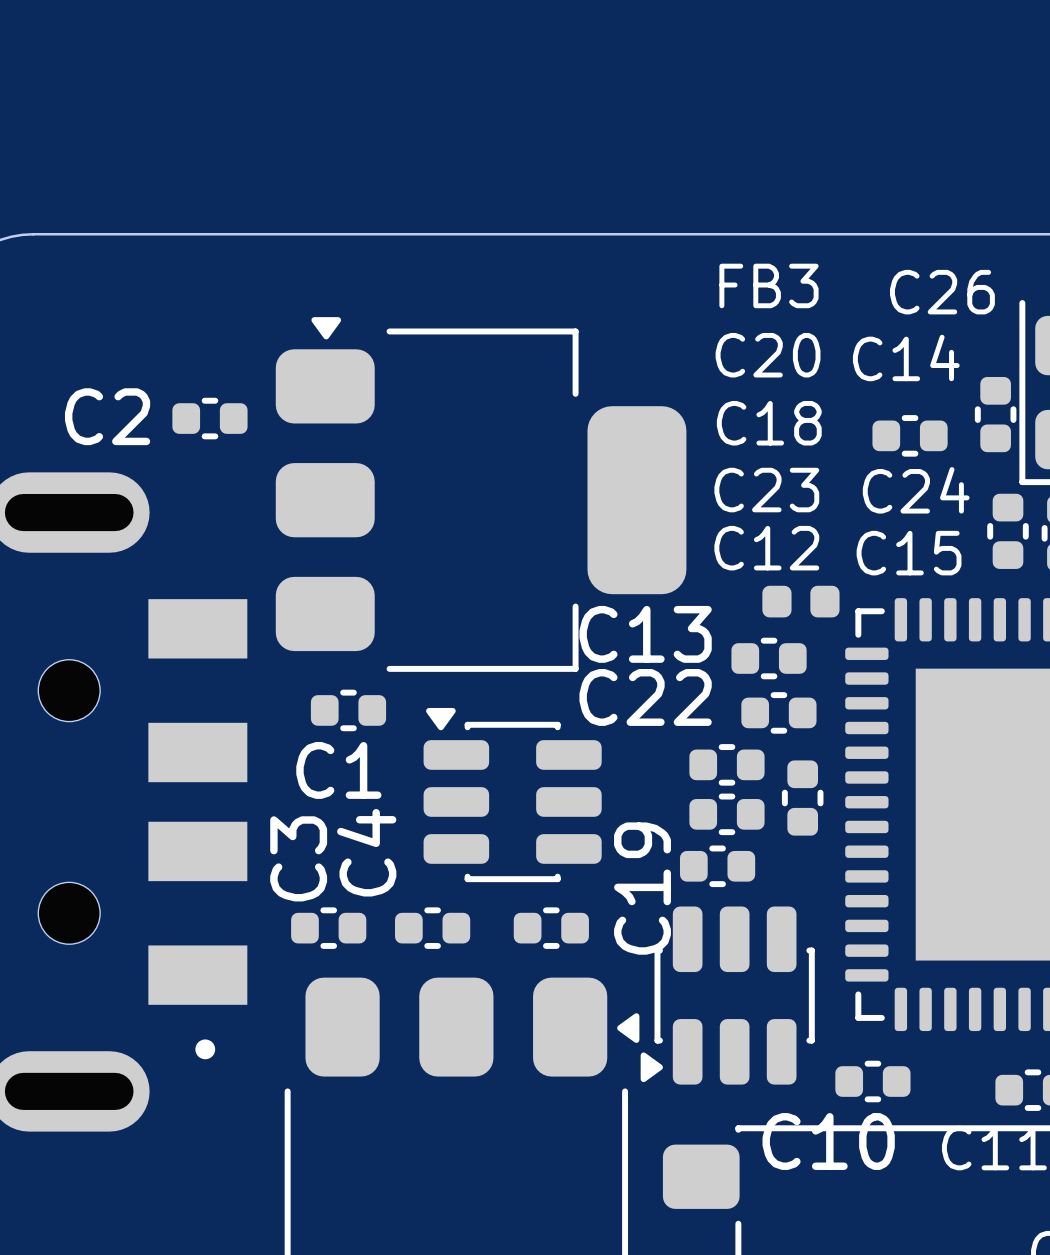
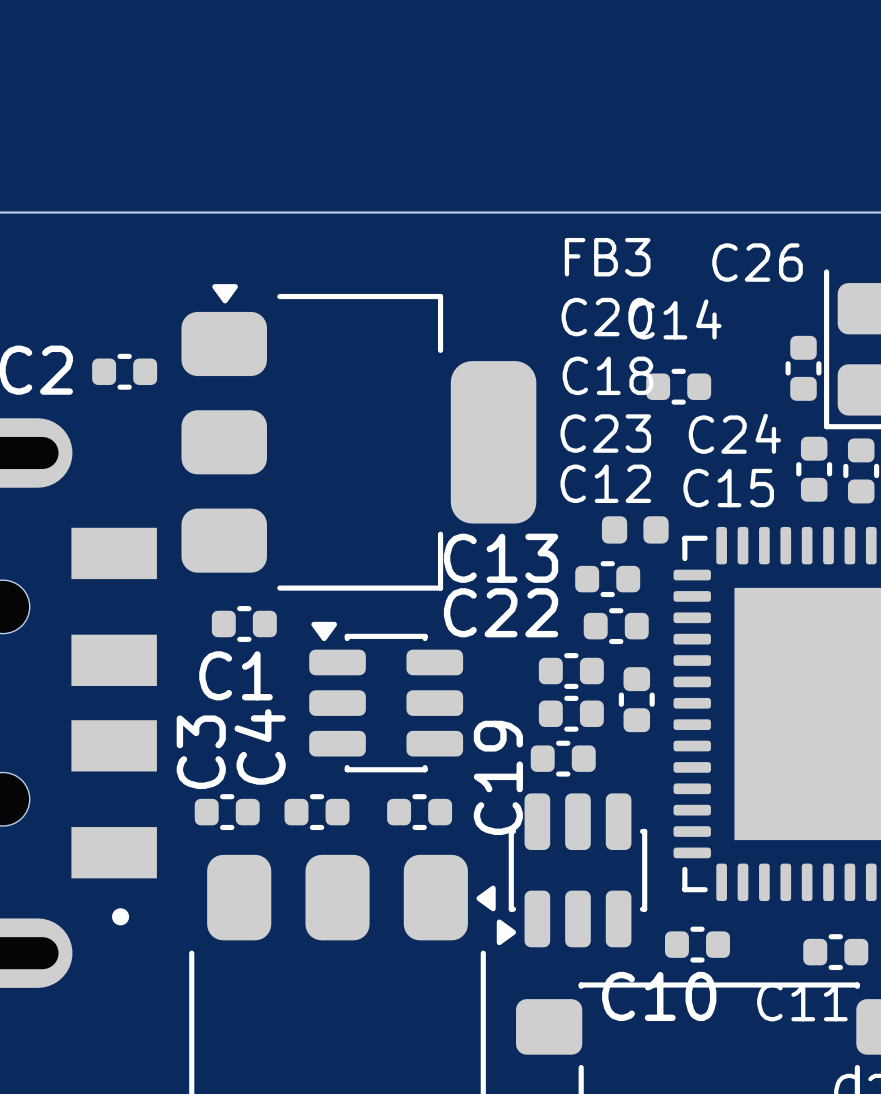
C14 position: (910, 435) -> (678, 386)

